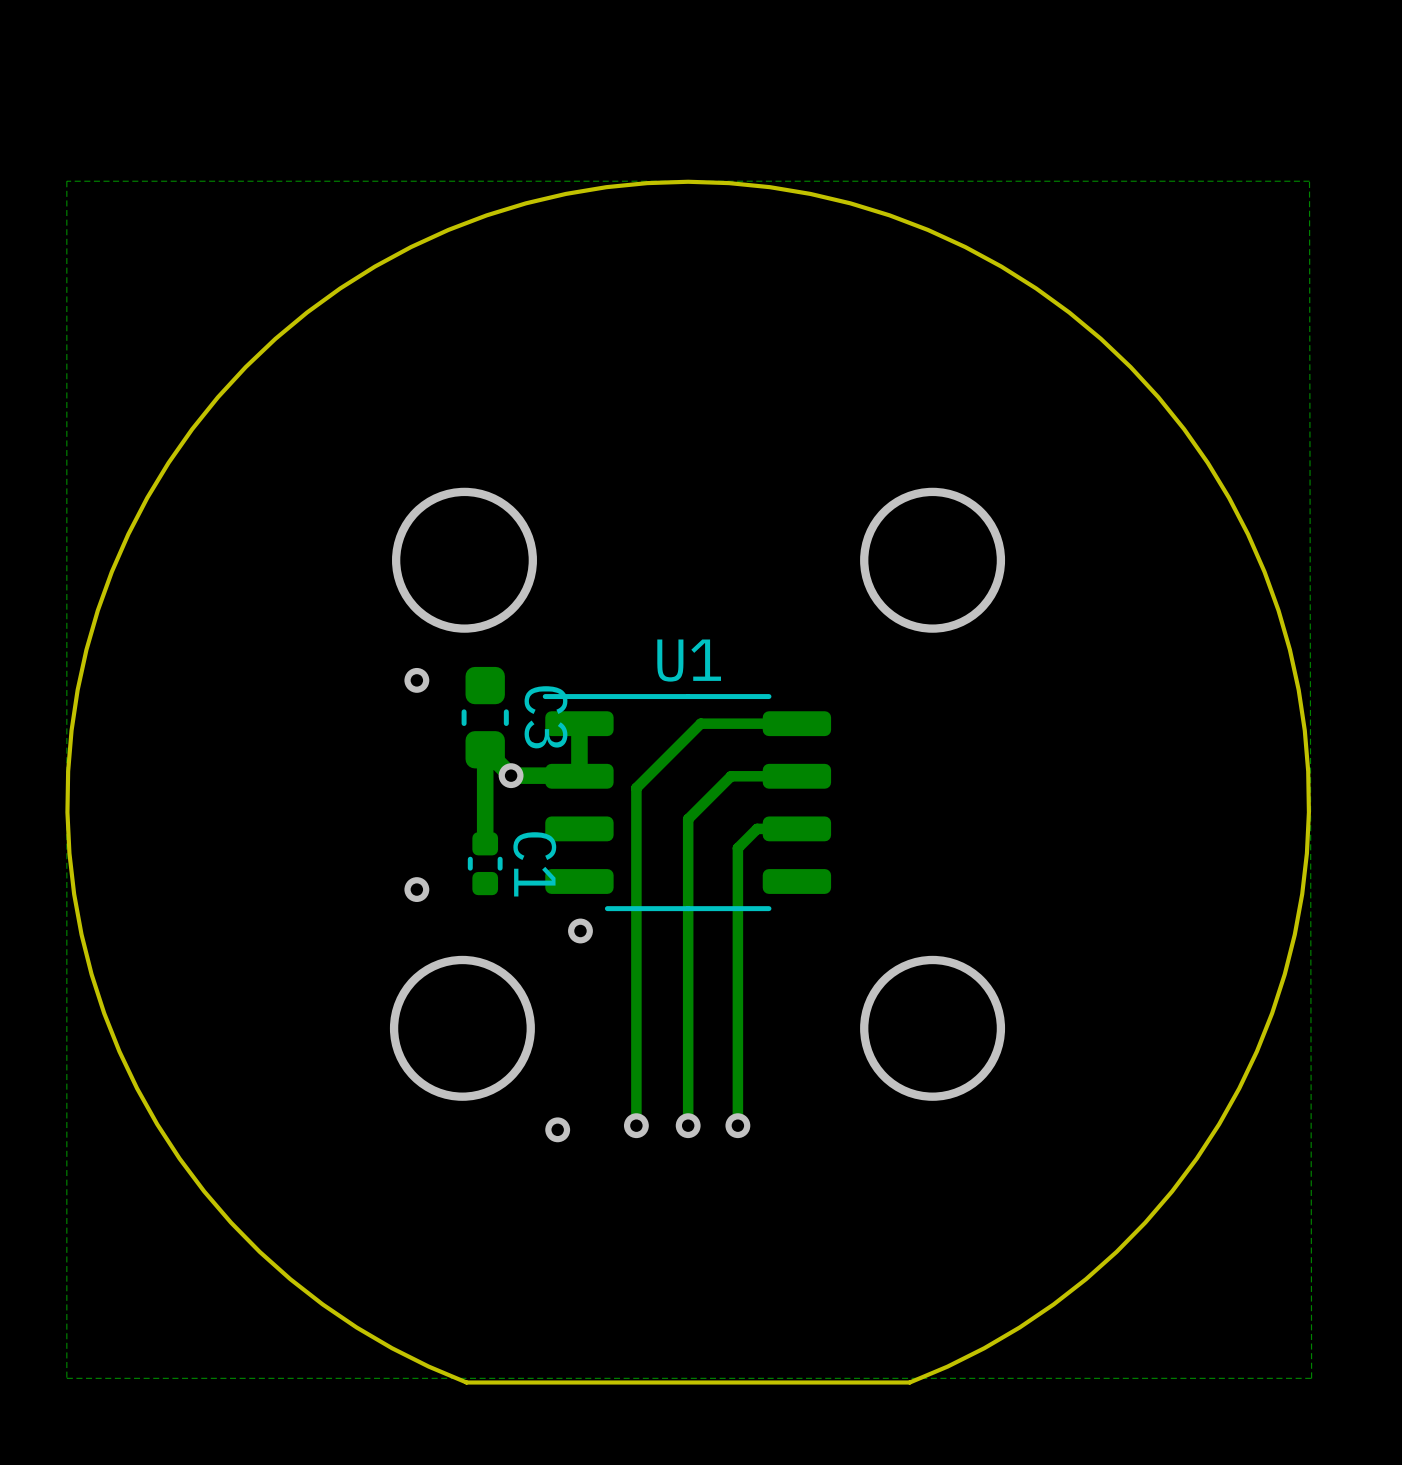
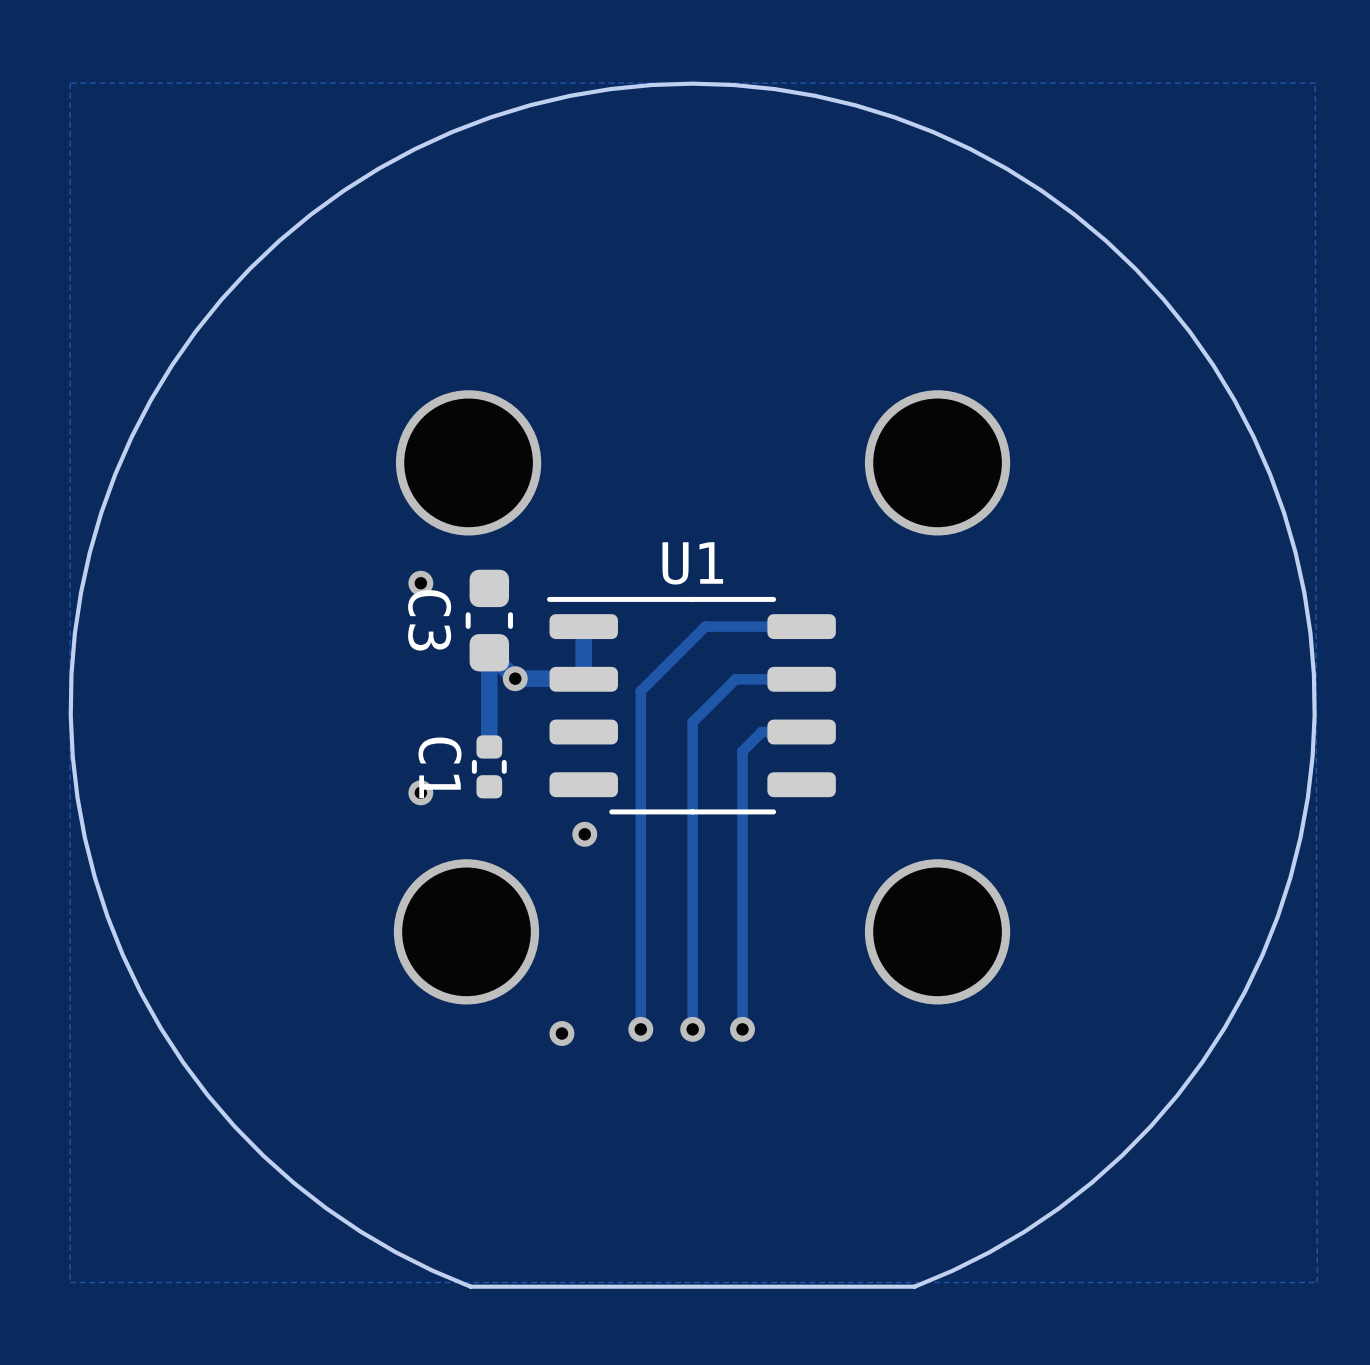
C3 name position: C3 (545, 717) -> C3 (429, 620)
C1 name position: C1 (534, 864) -> C1 (440, 767)

